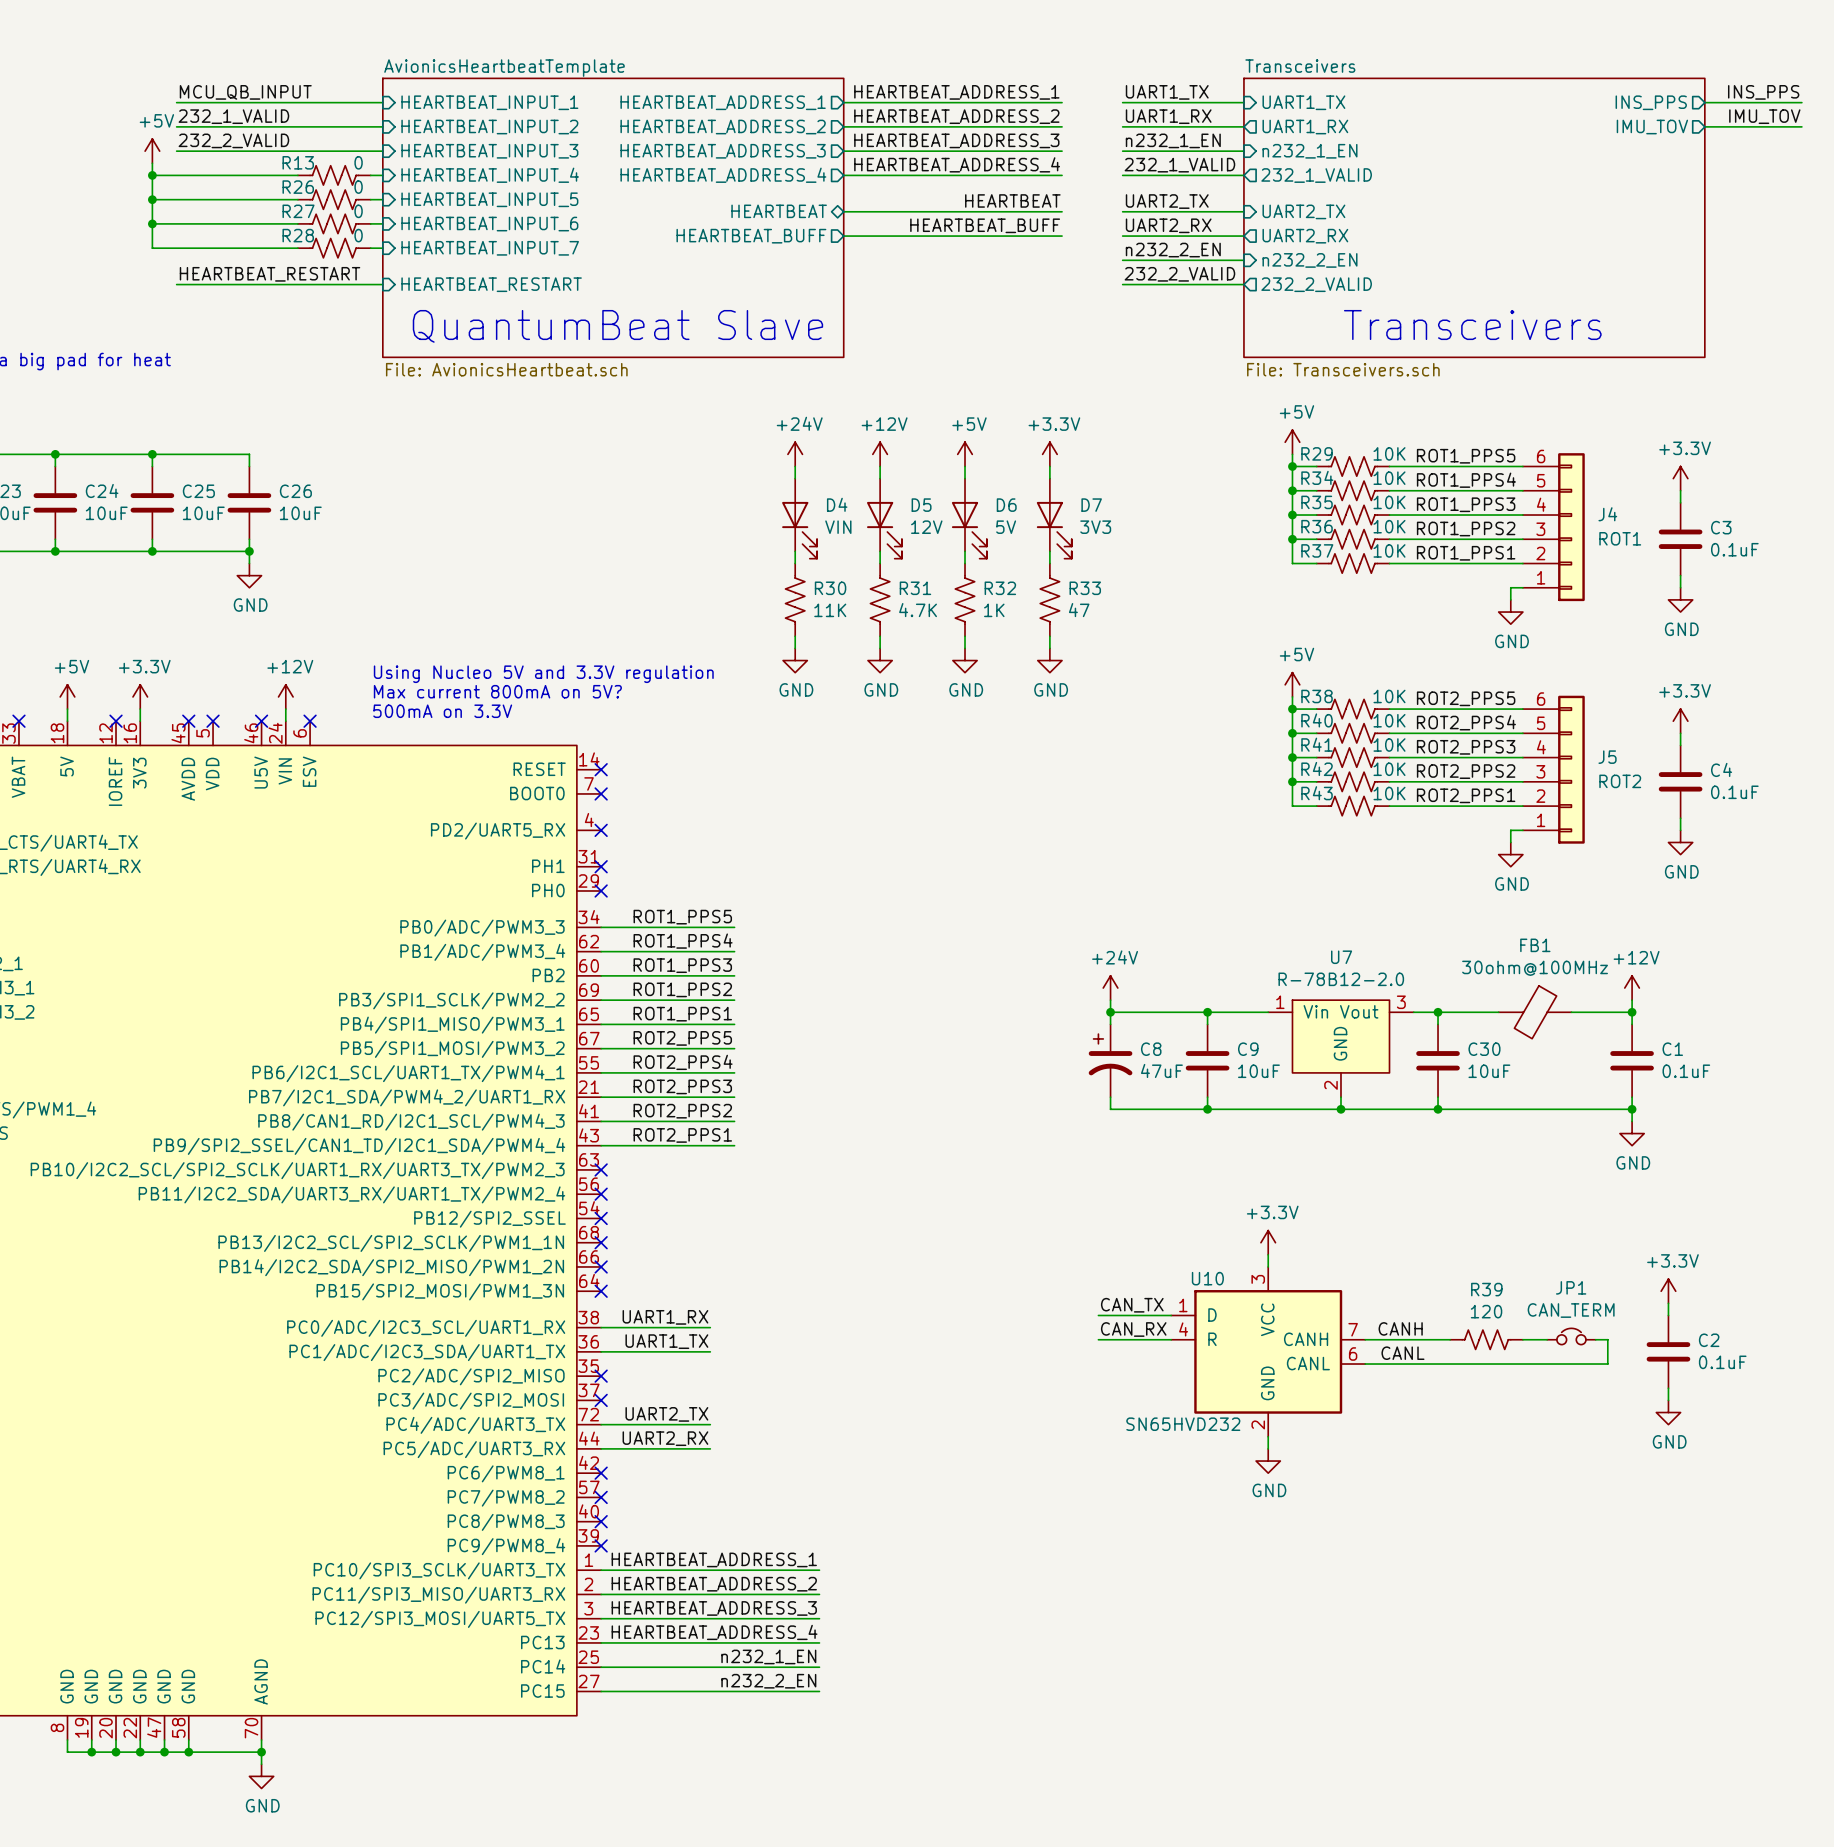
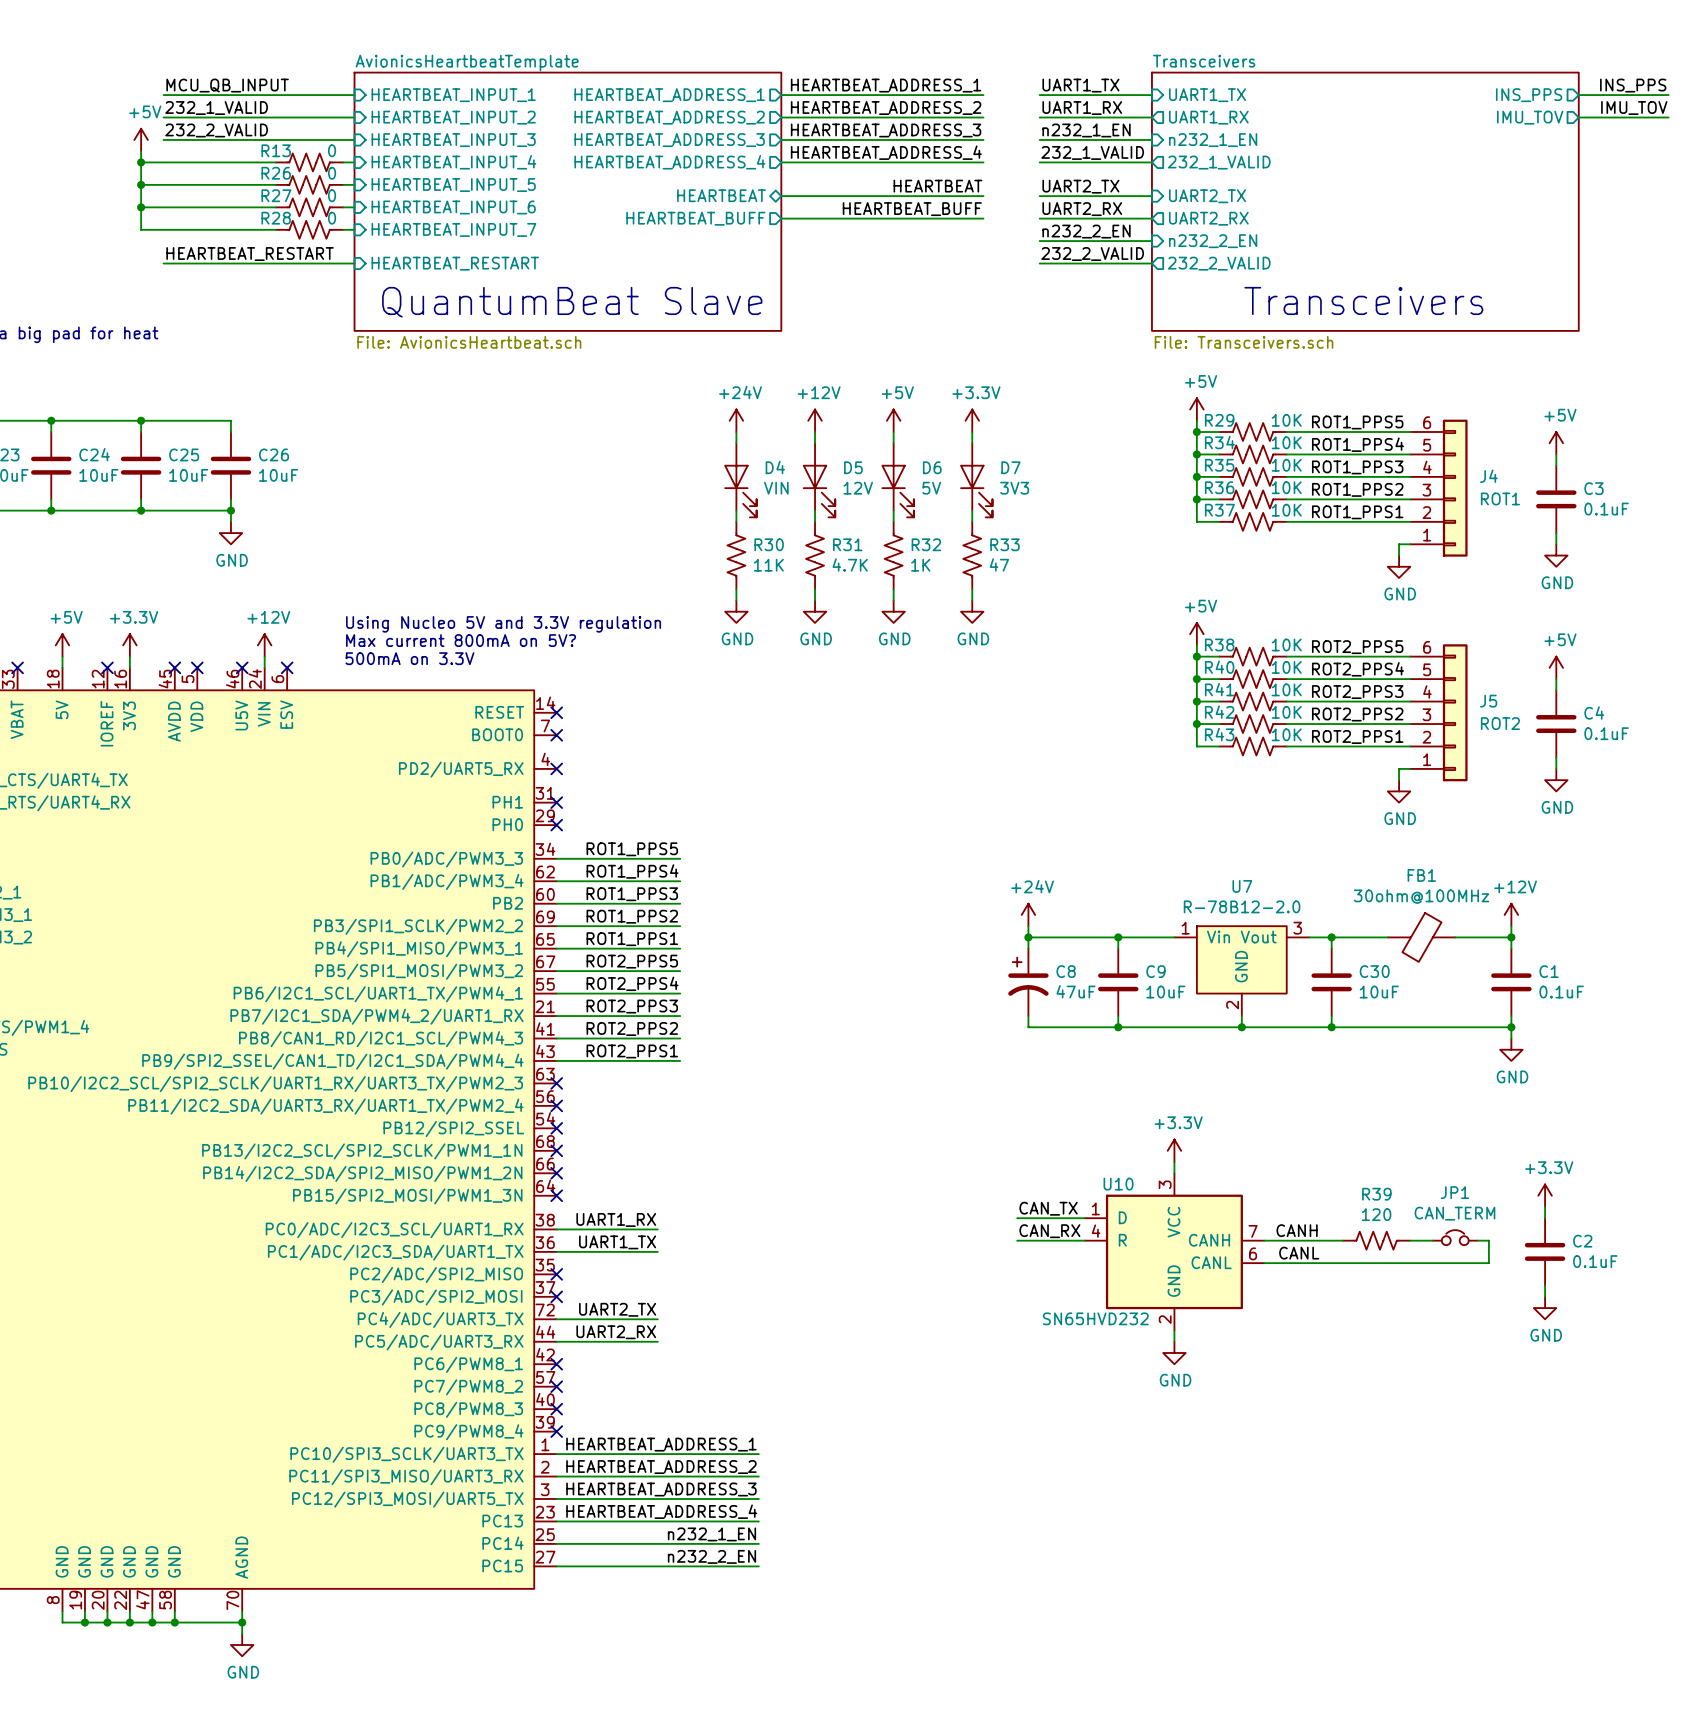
power symbol: +3.3V (1680, 478) -> +5V (1556, 443)
power symbol: +3.3V (1680, 721) -> +5V (1556, 667)

